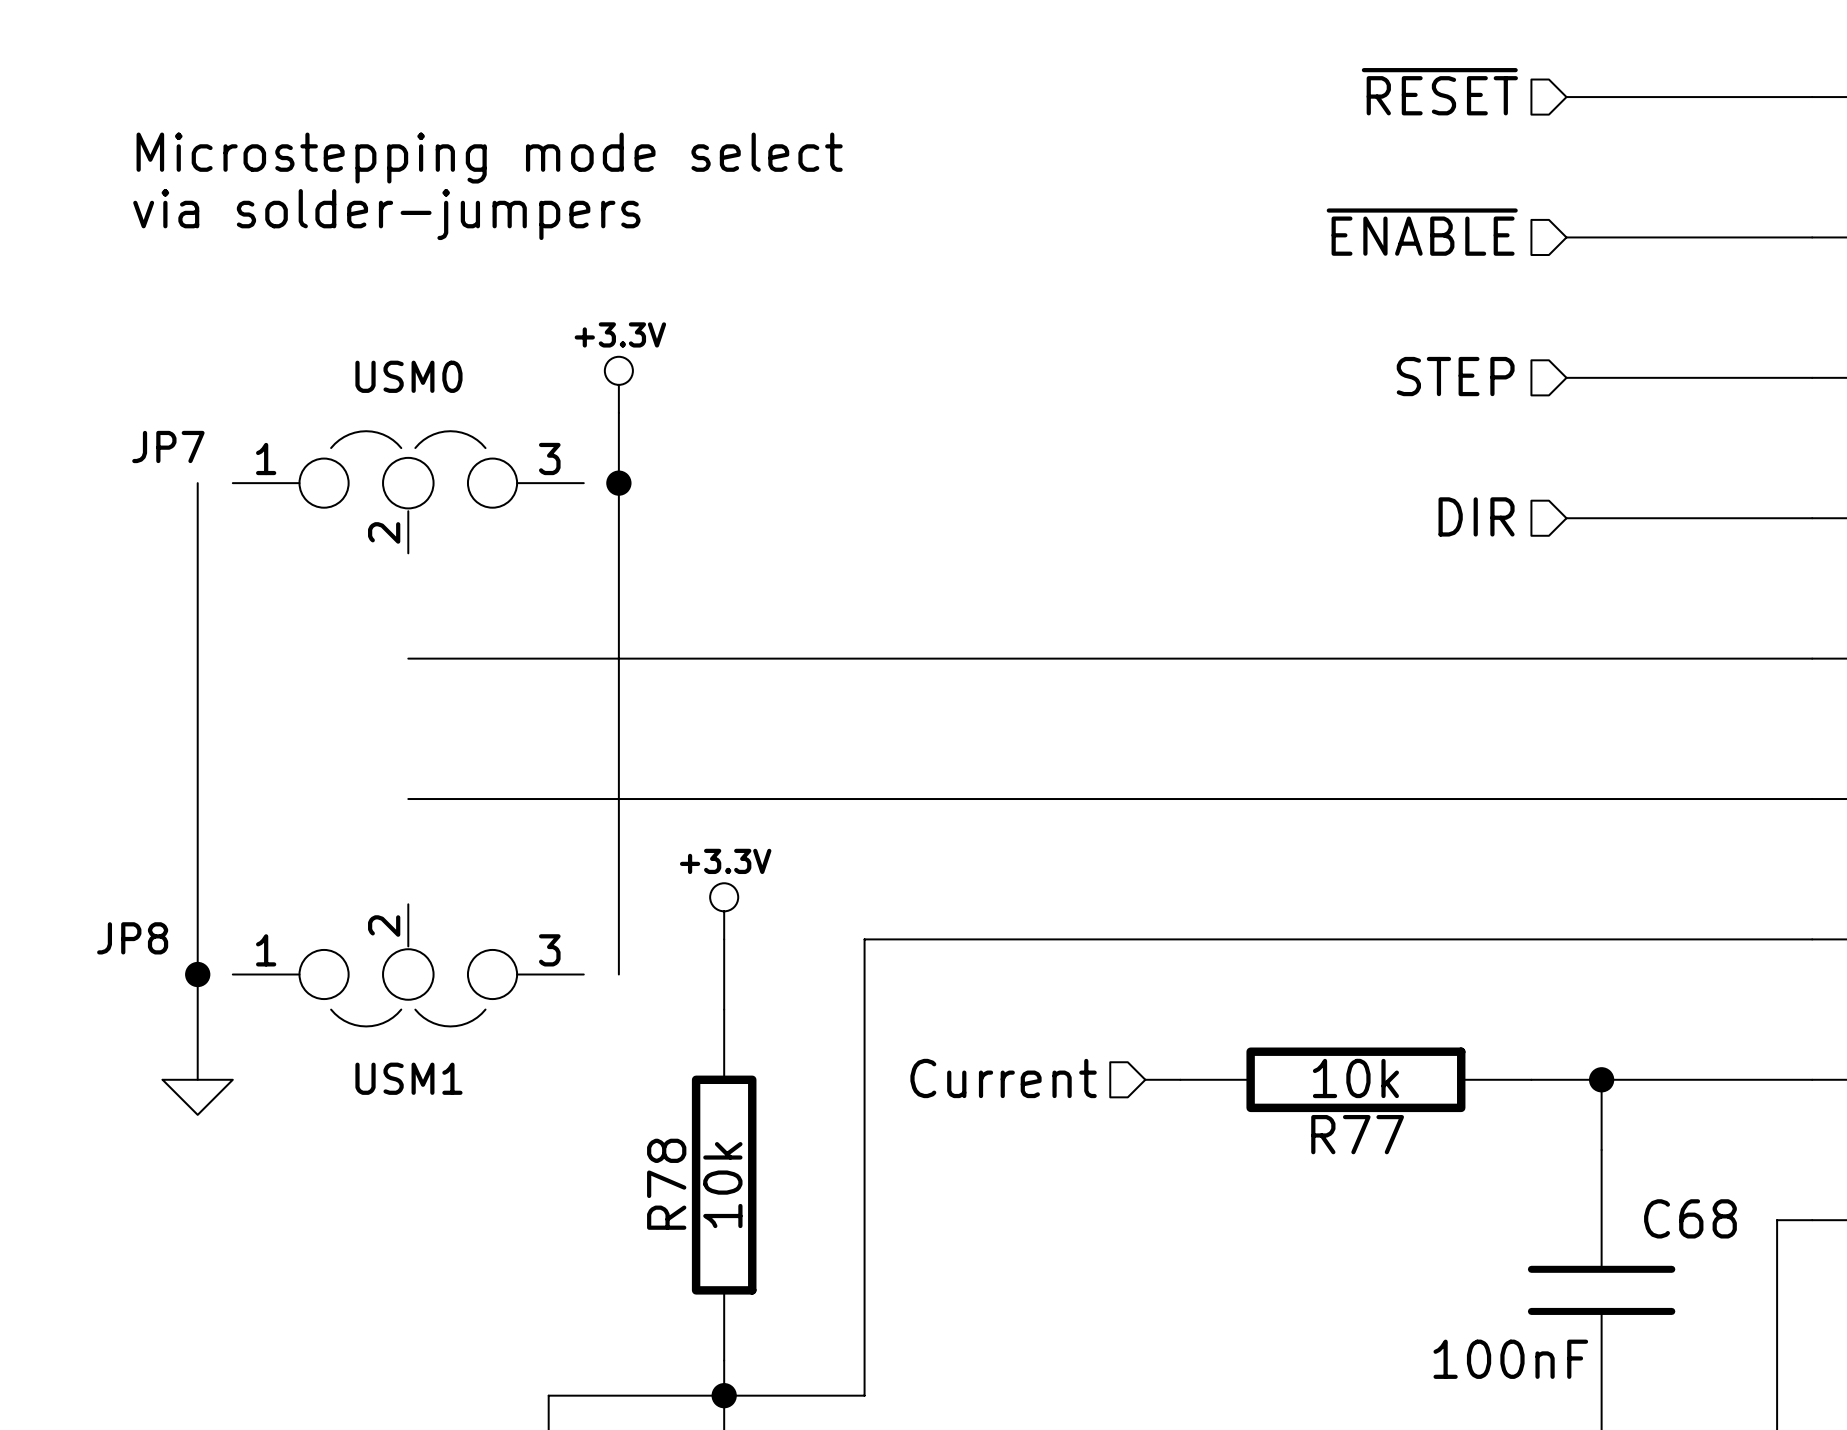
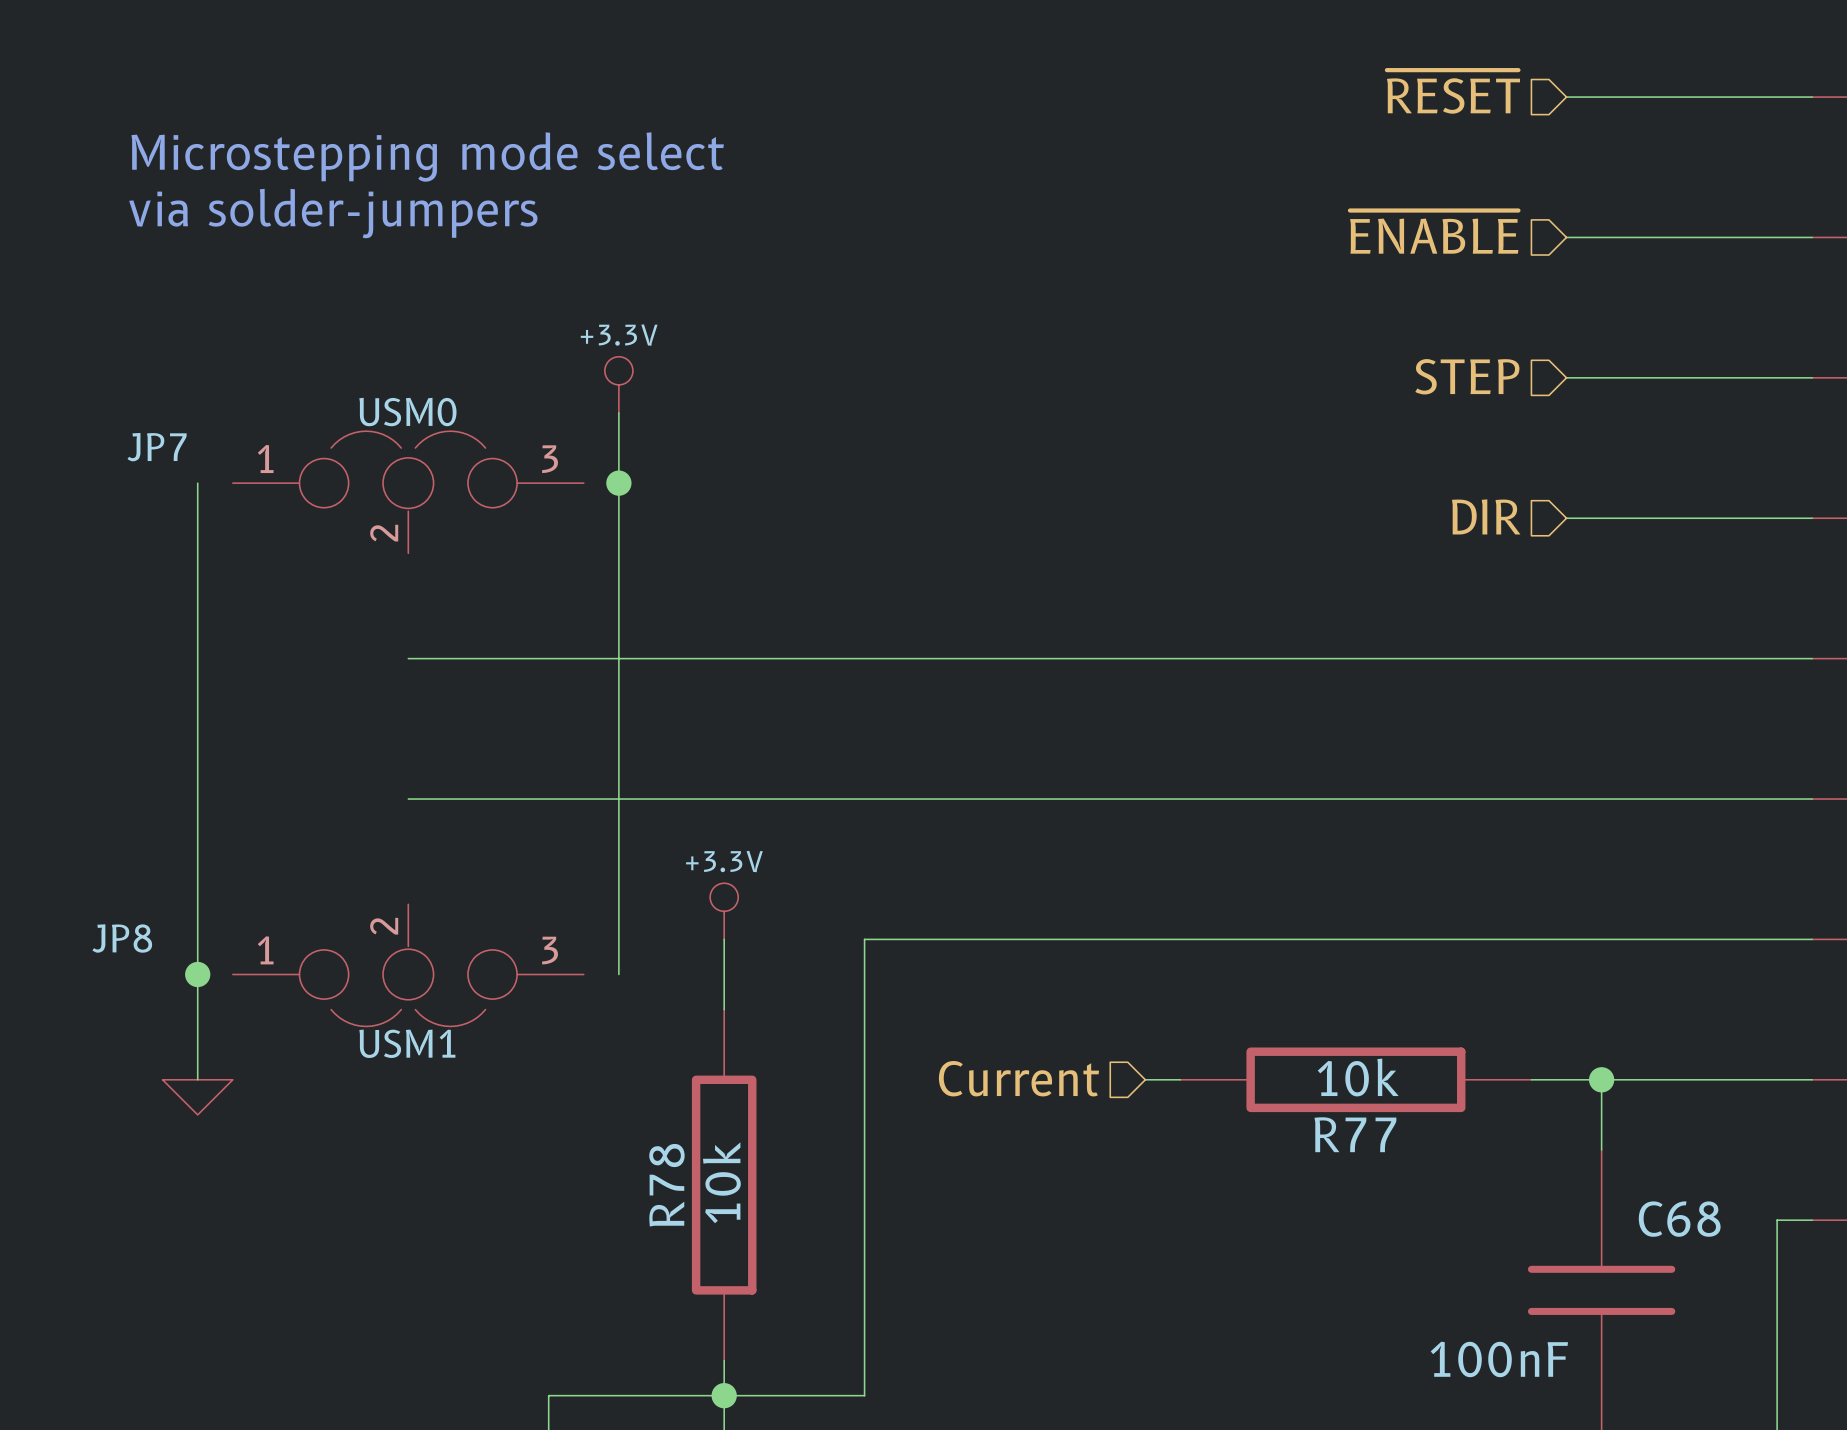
JP7 value position: USM0 (408, 376) -> USM0 (407, 412)
JP8 value position: USM1 (408, 1078) -> USM1 (407, 1043)

